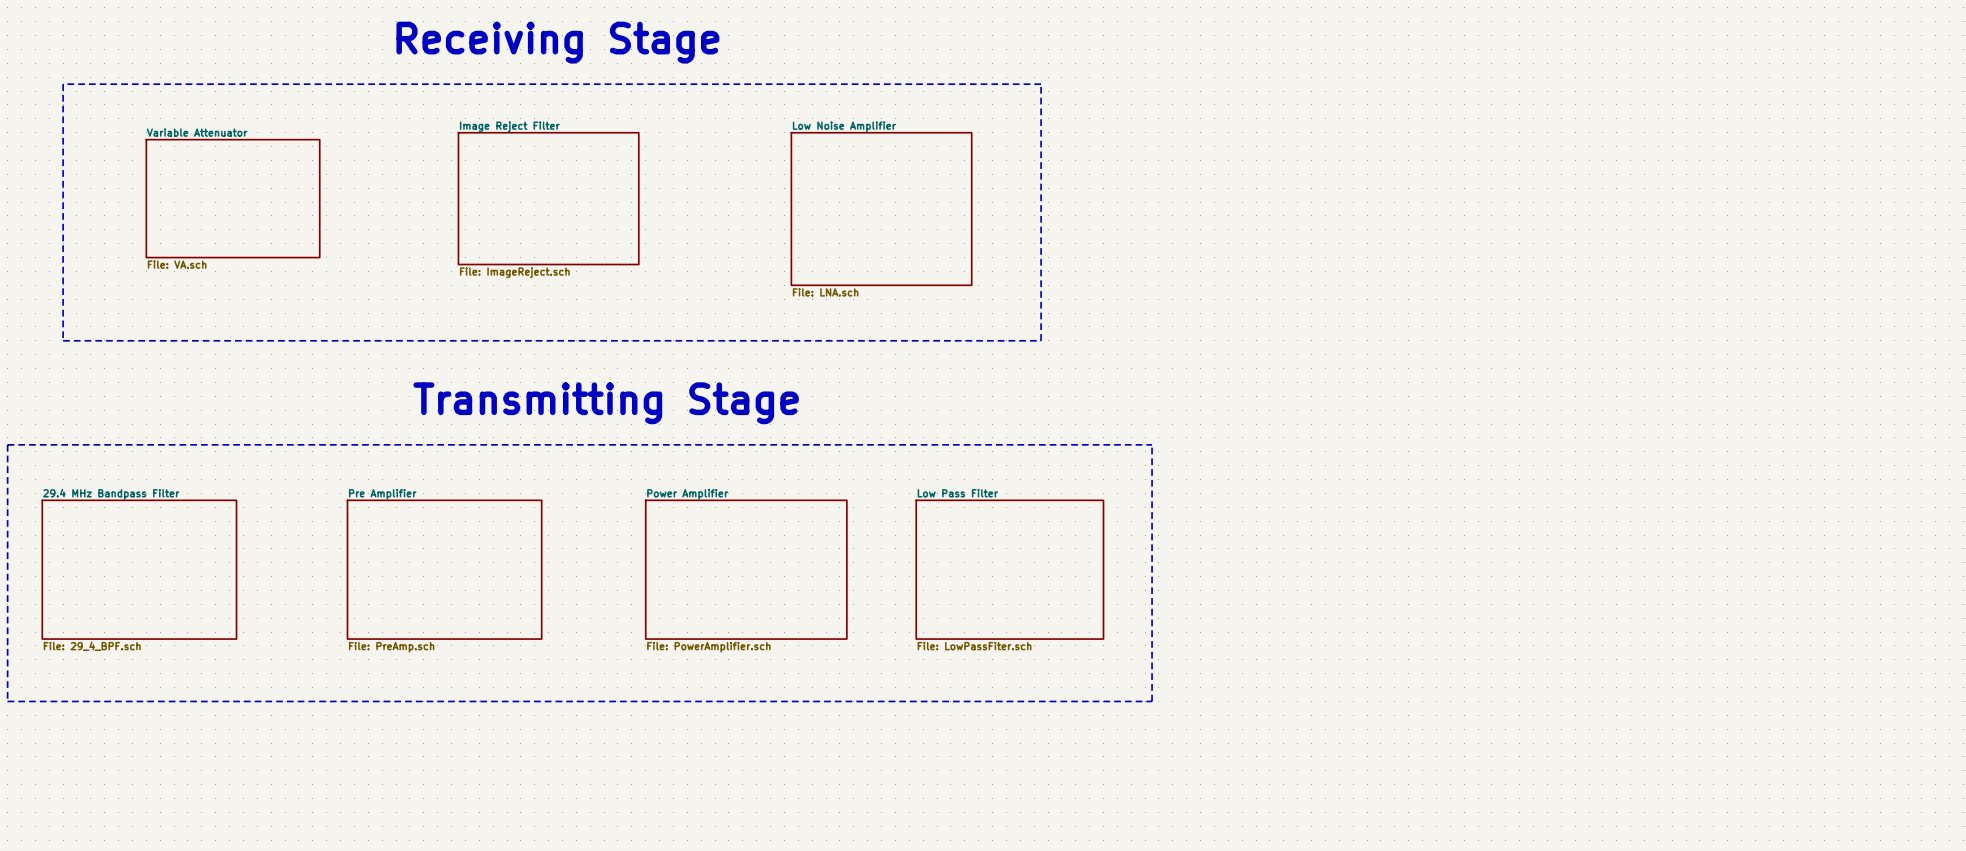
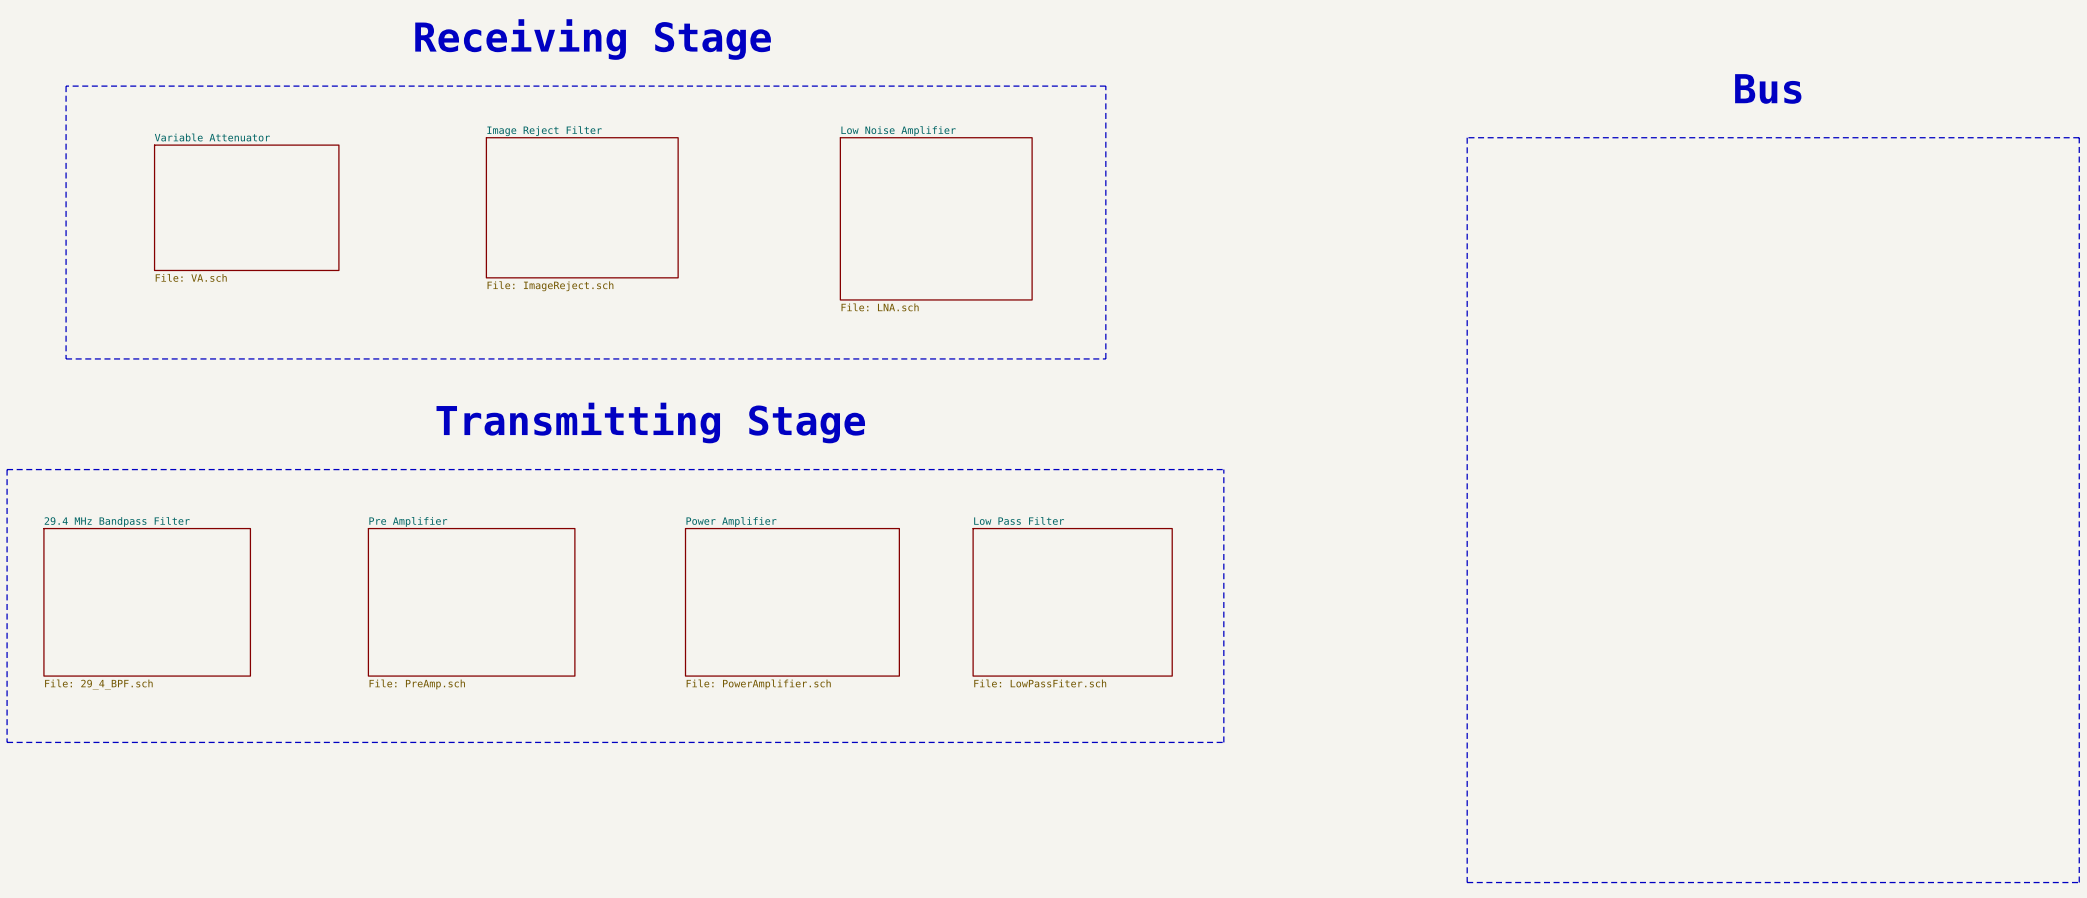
text: none -> Bus (1768, 88)
line: none -> (1467, 137) (1467, 882) (2079, 882) (2079, 137) (1467, 137)

